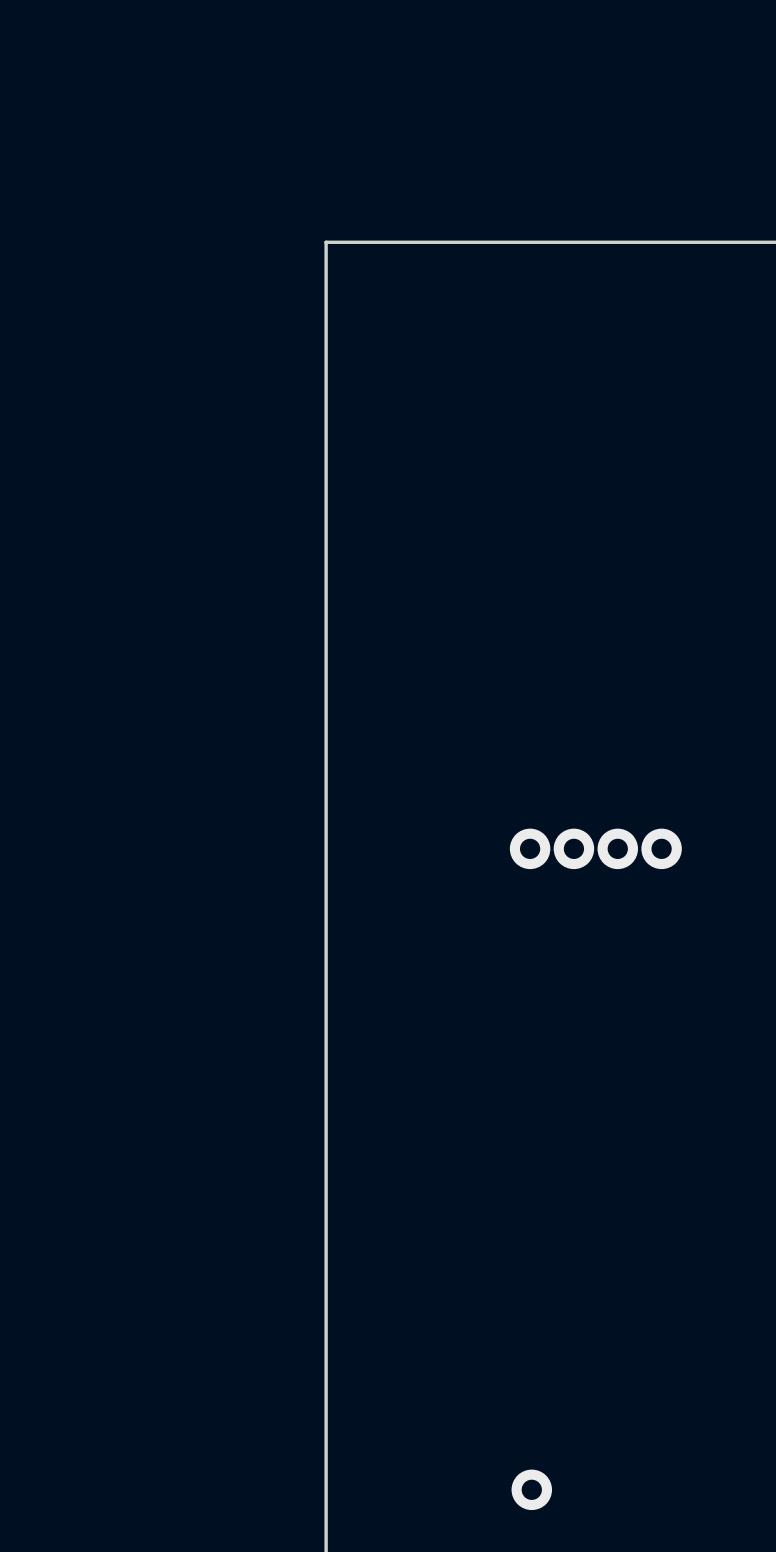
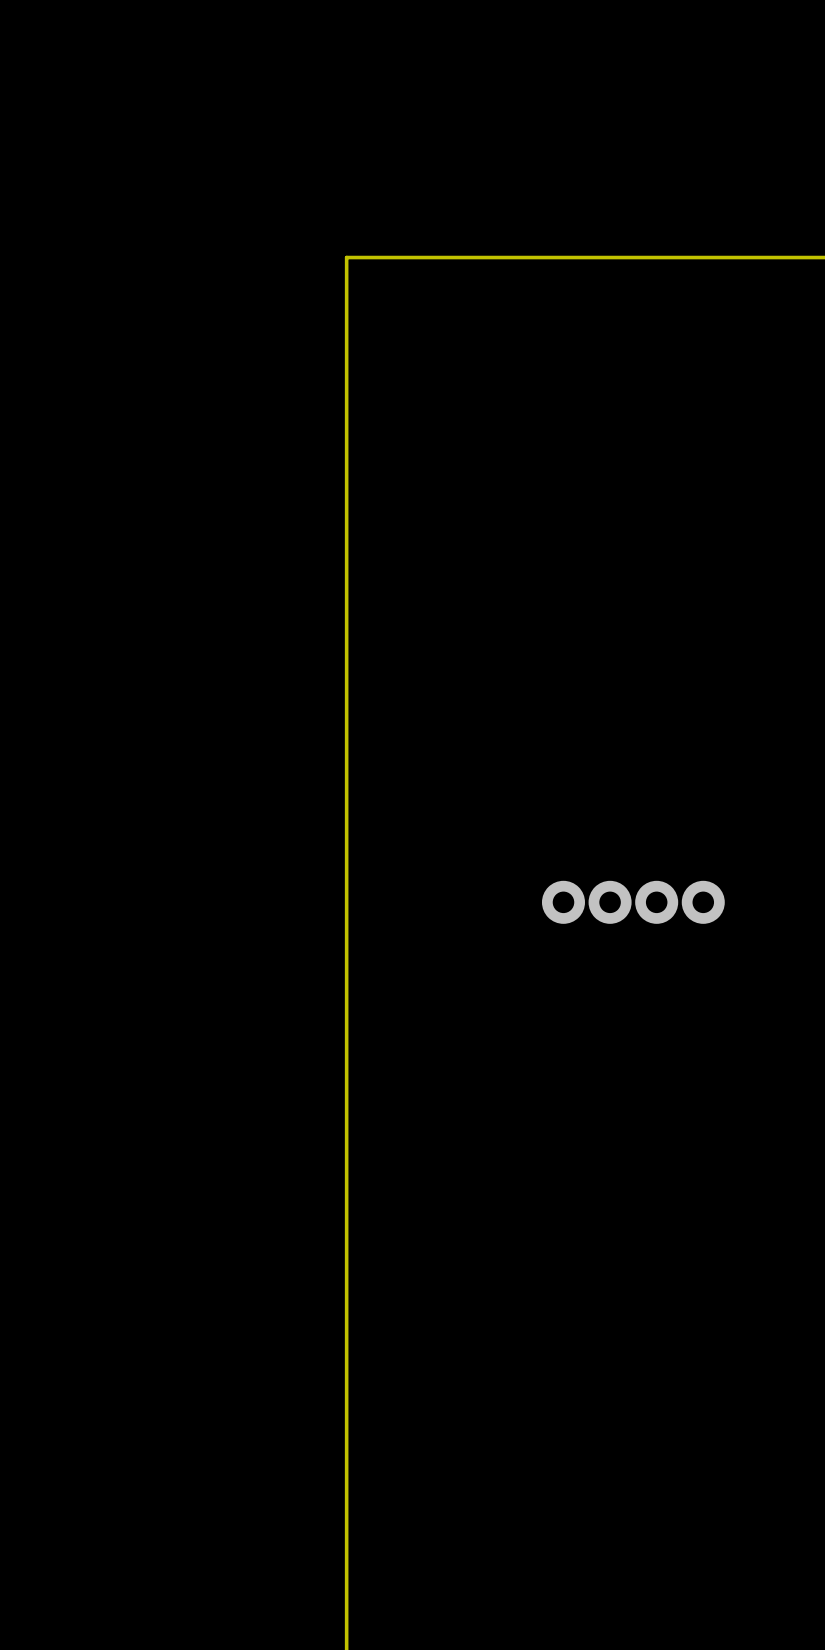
via: (531, 1489) -> none

